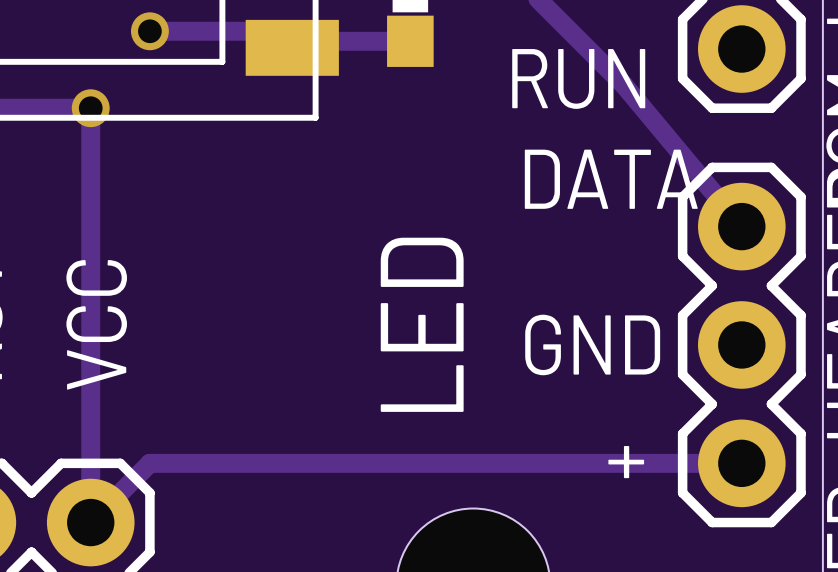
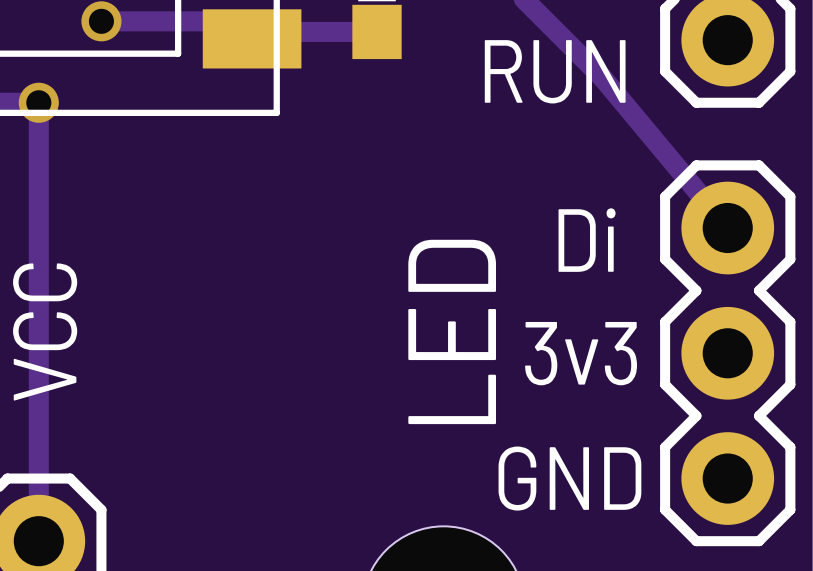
text: DATA (611, 179) -> none
text: none -> Di (587, 240)
text position: LED (422, 324) -> LED (452, 331)
text position: GND (592, 344) -> GND (569, 478)
text: none -> 3v3 (581, 353)
text: + (626, 462) -> none
track: (741, 463) (149, 463) (90, 522) -> none

